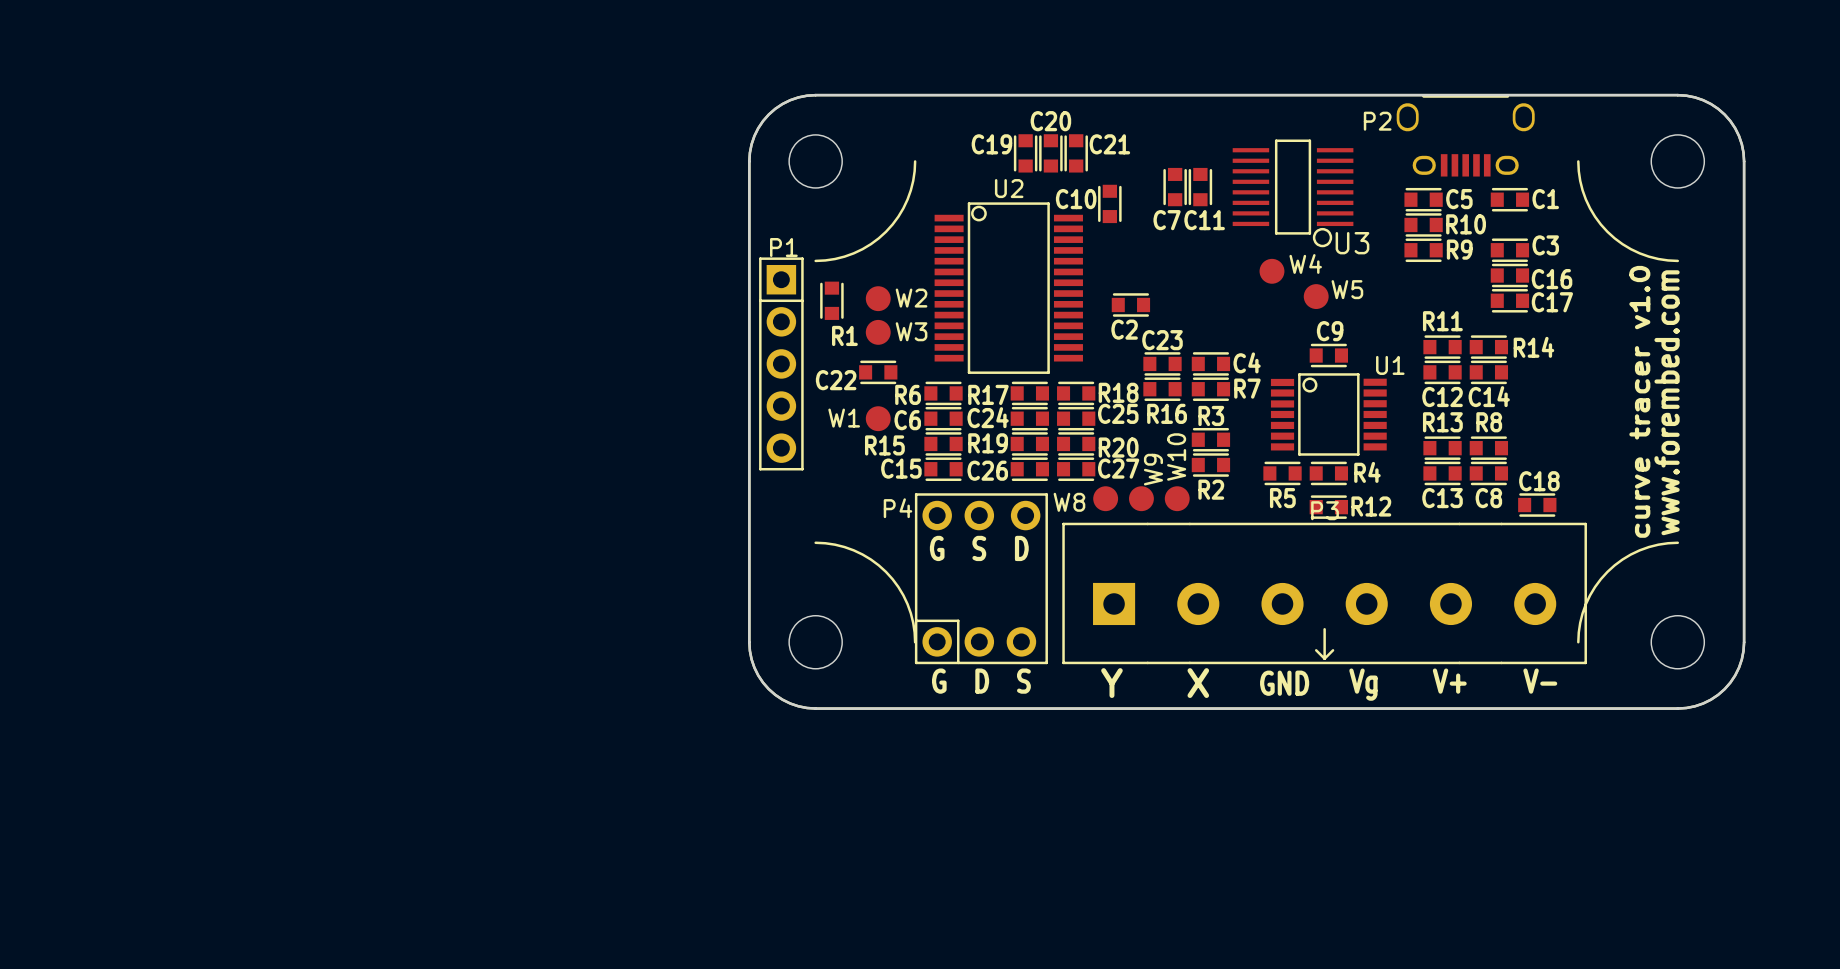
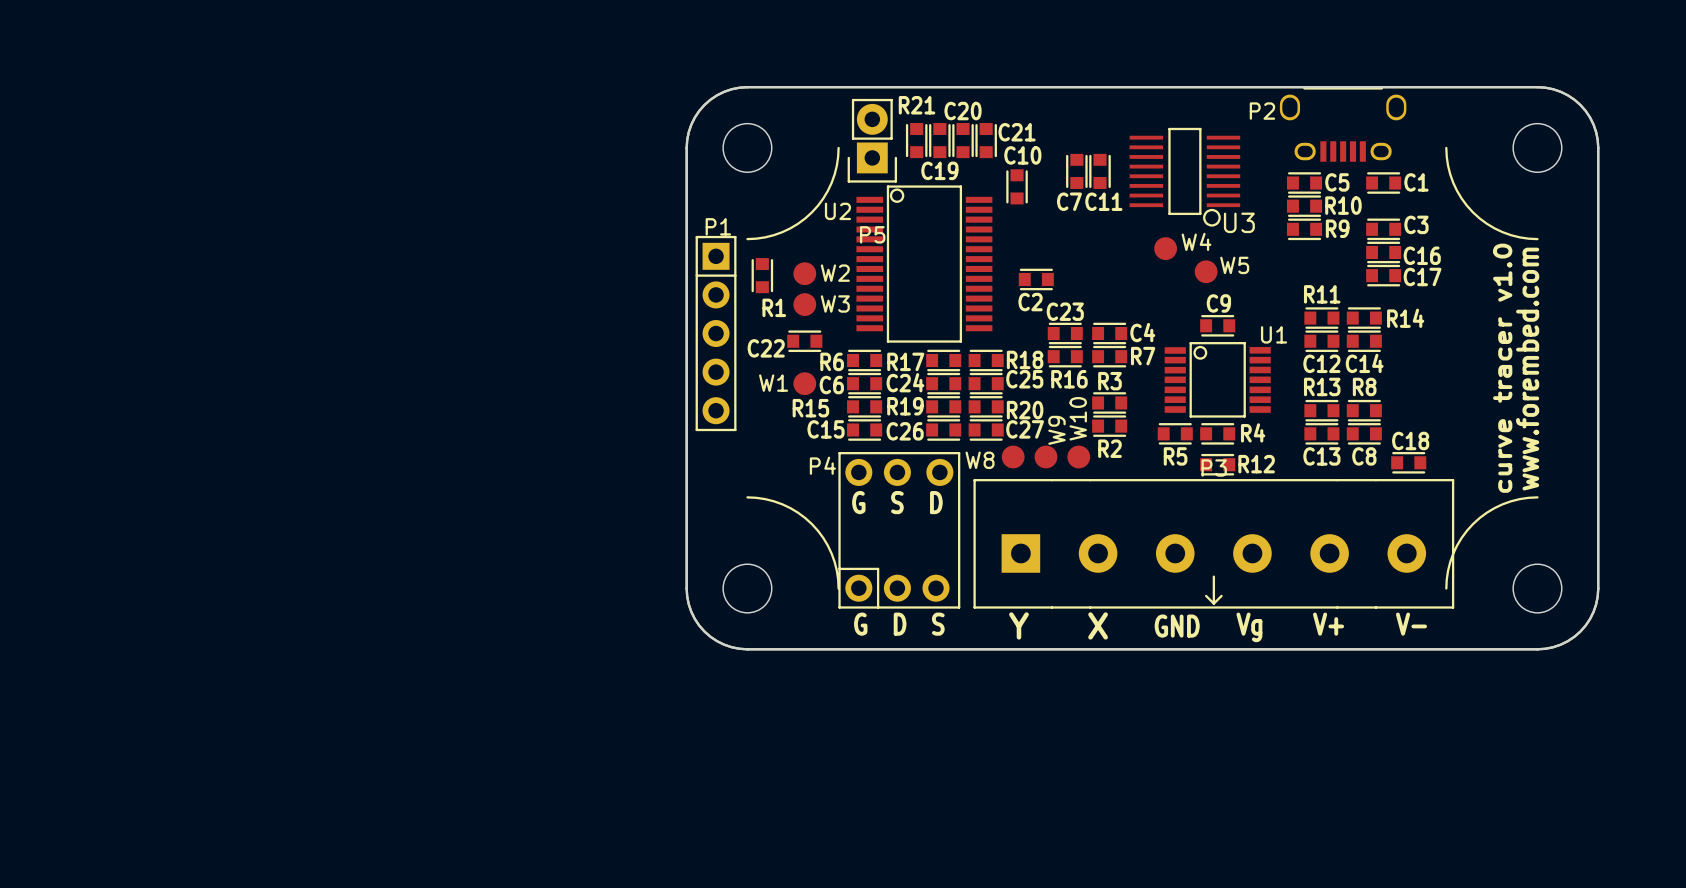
C19 name position: C19 (991, 144) -> C19 (939, 170)
P5: none -> (872, 140)
R21: none -> (916, 140)
U2 name position: U2 (1009, 188) -> U2 (837, 211)
C10 name position: C10 (1076, 199) -> C10 (1022, 155)

